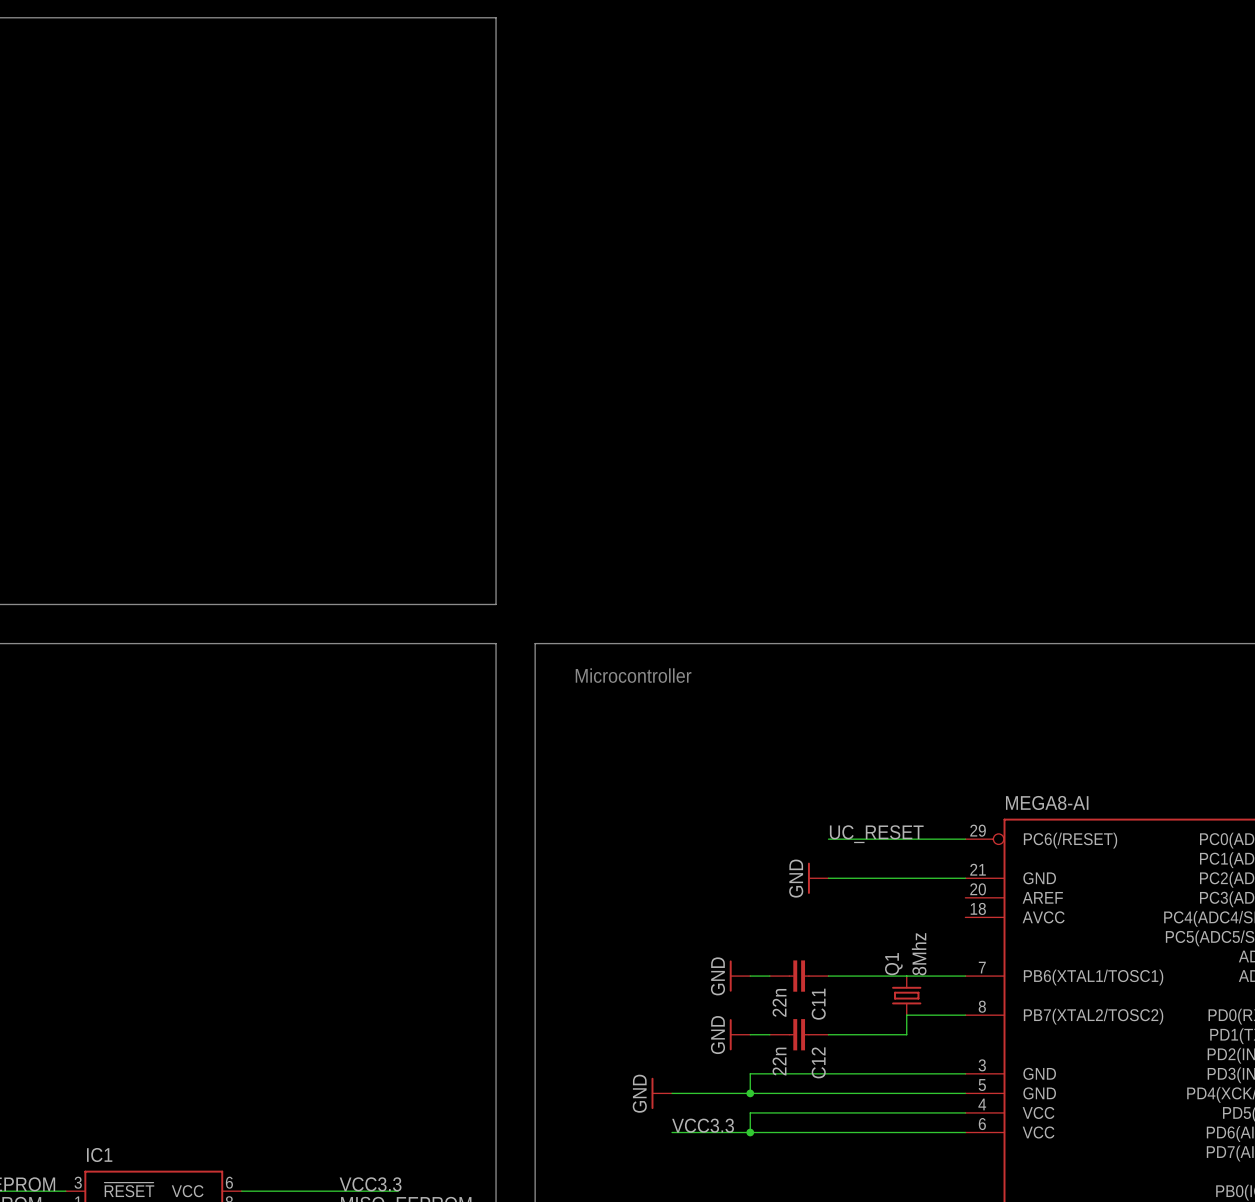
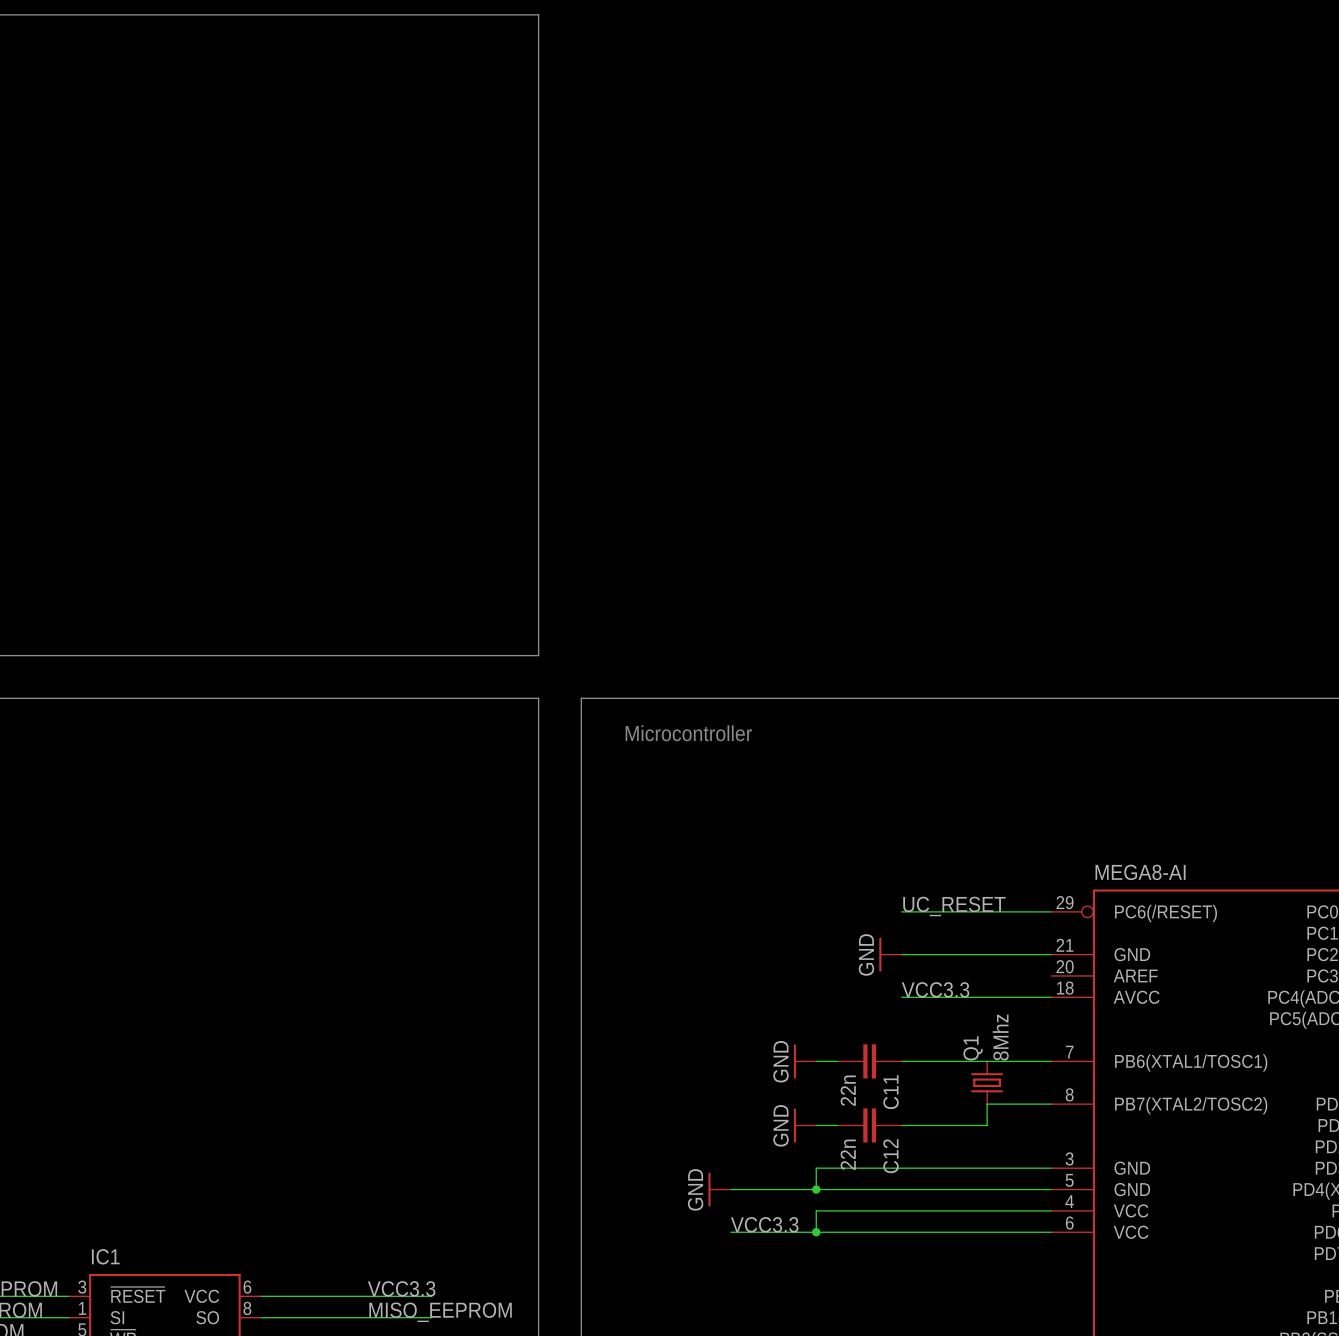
label: none -> VCC3.3 (935, 989)
wire: none -> (901, 997) (1051, 997)

